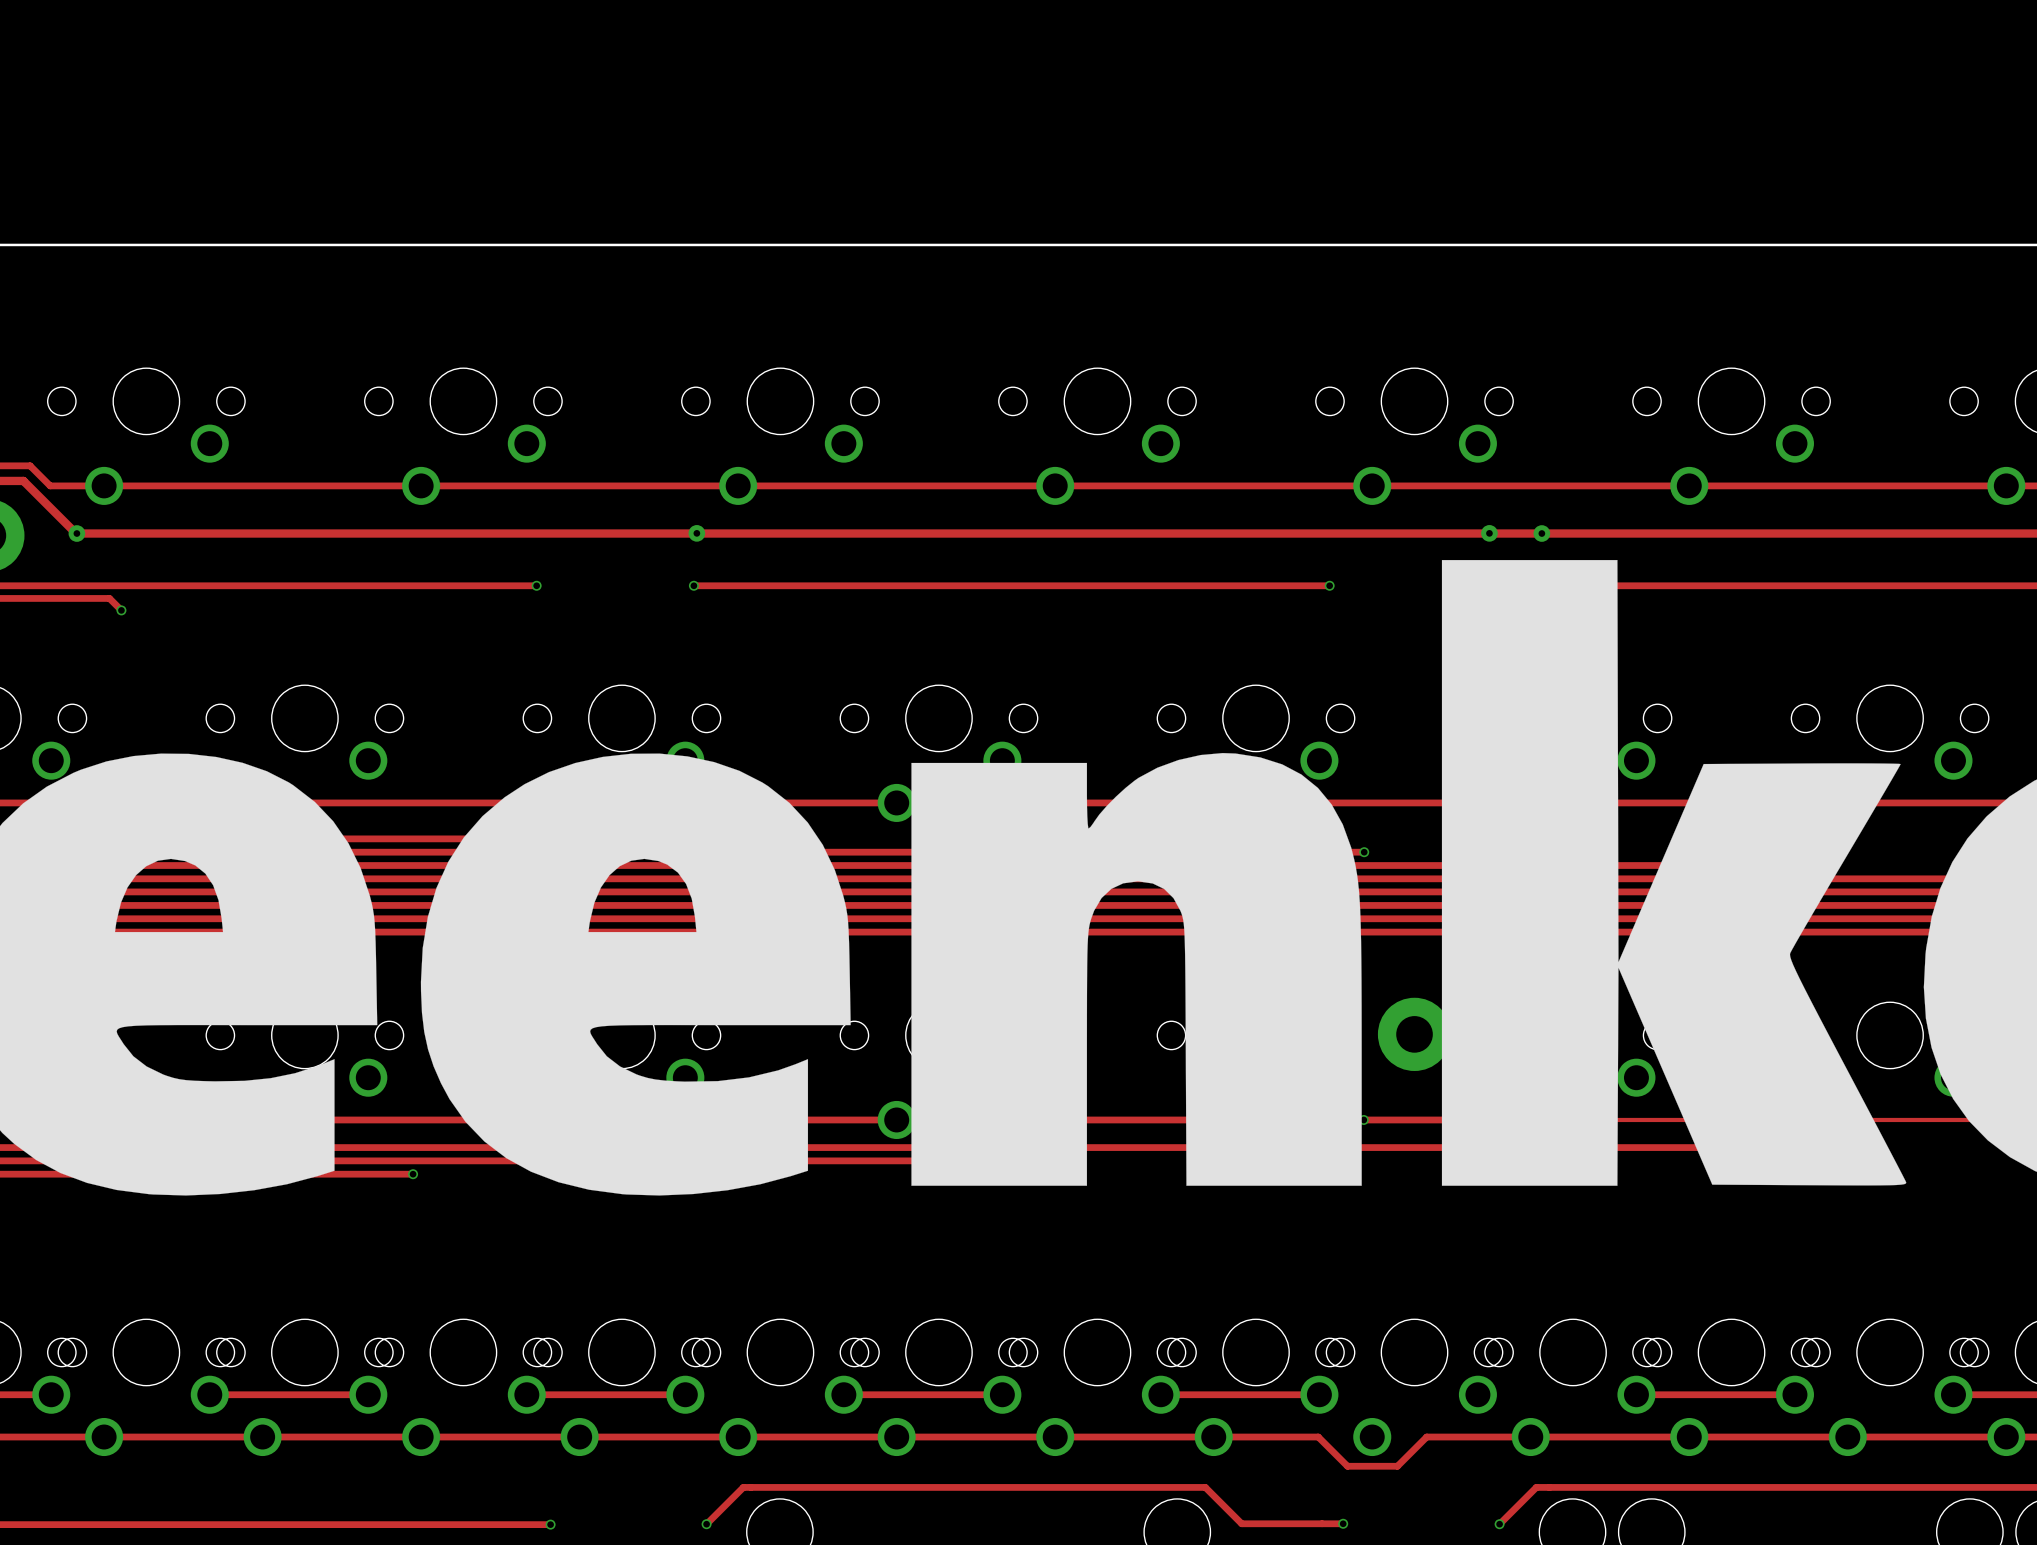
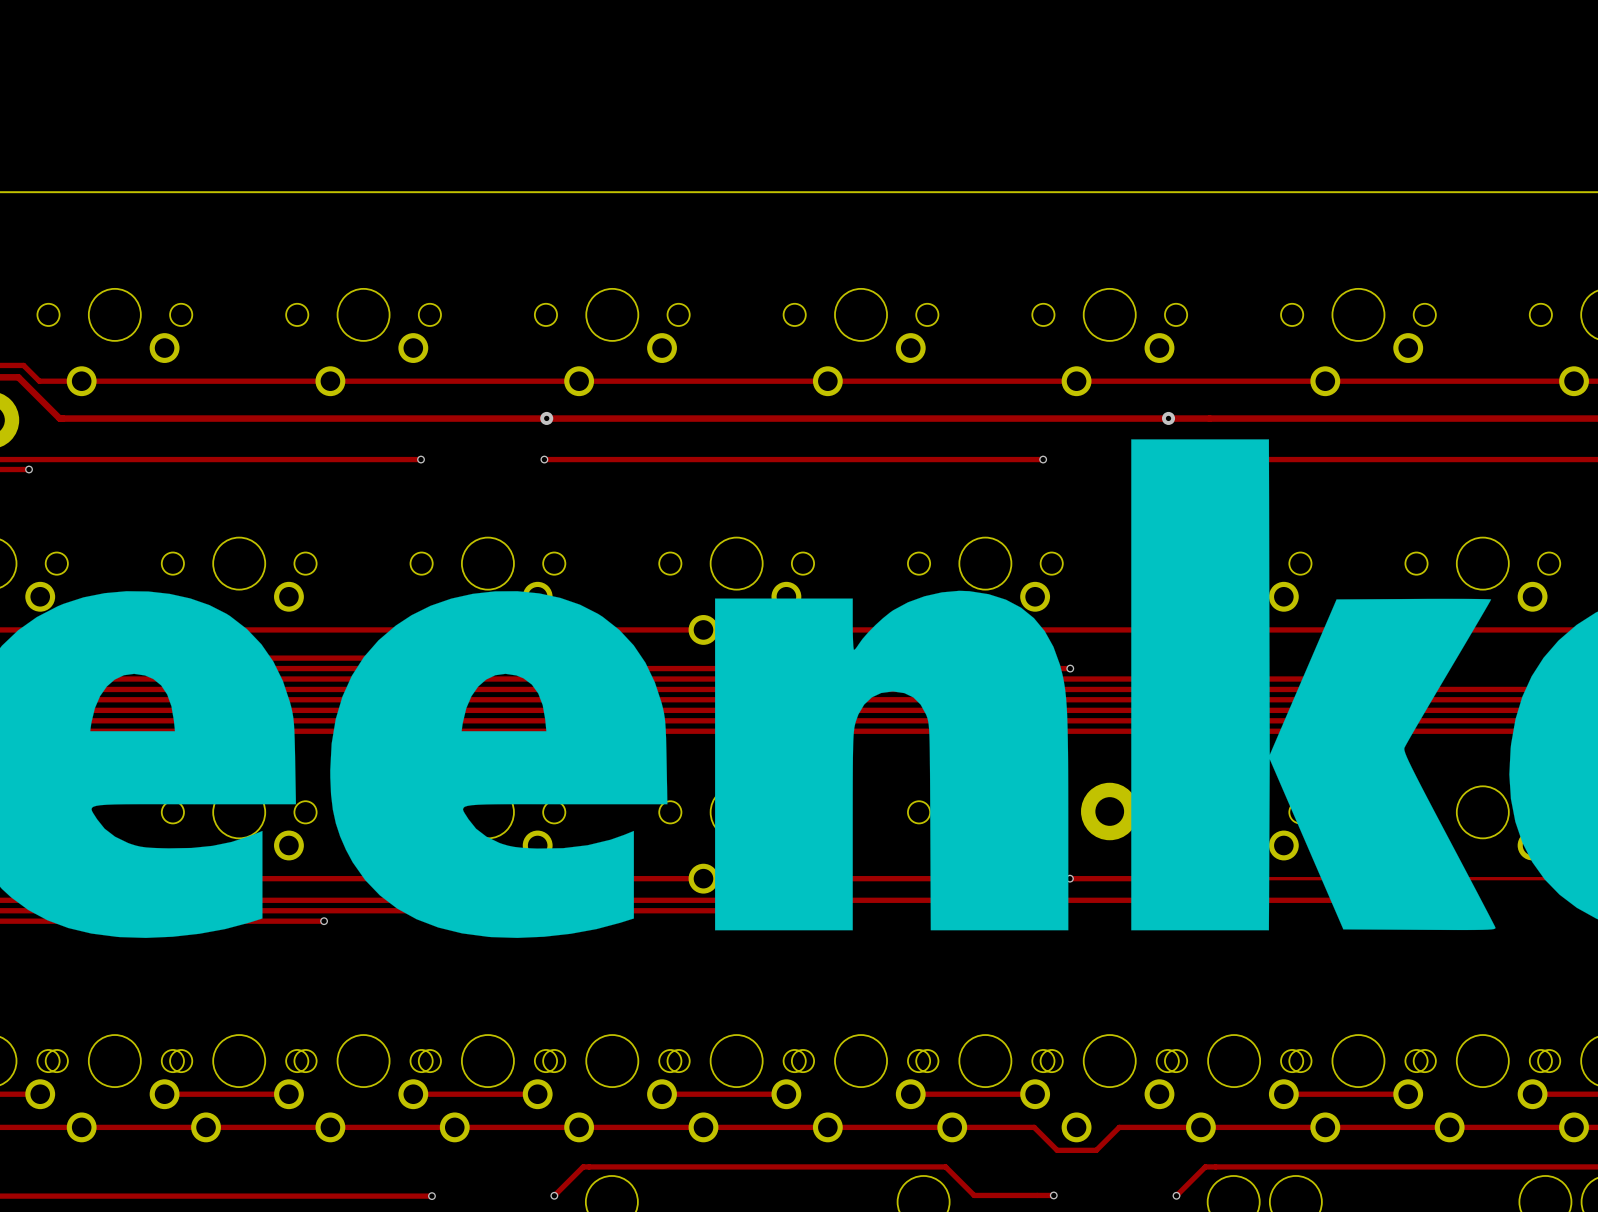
via: (76, 533) -> none
via: (1541, 533) -> none
track: (37, 598) (109, 598) (121, 610) -> none
via position: (121, 610) -> (29, 469)

